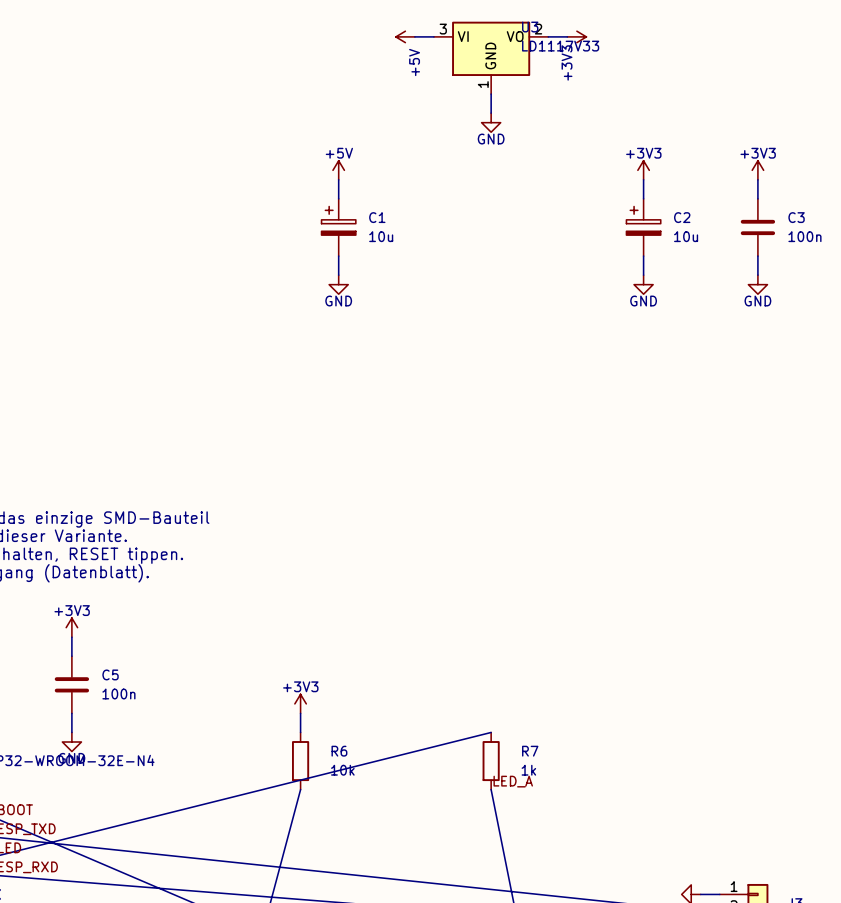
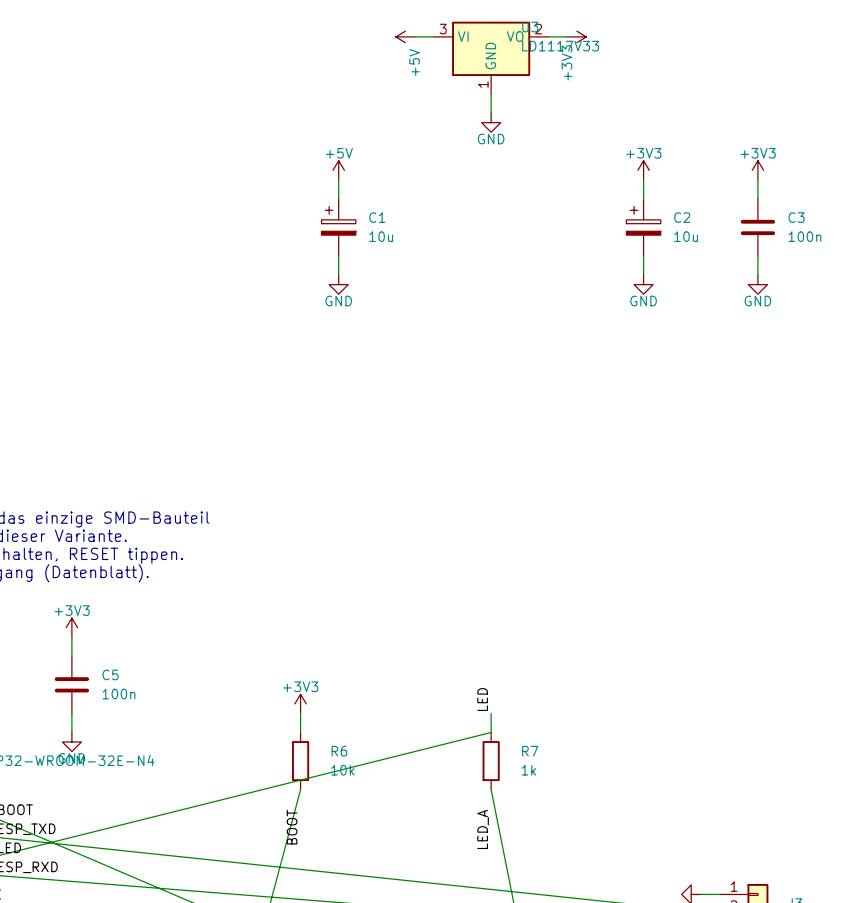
label: none -> LED (482, 699)
wire: none -> (491, 713) (491, 732)
label rotation: 0° (513, 781) -> 90° counterclockwise (483, 829)
label position: LED_A (513, 781) -> LED_A (483, 829)
label: none -> BOOT (292, 827)

